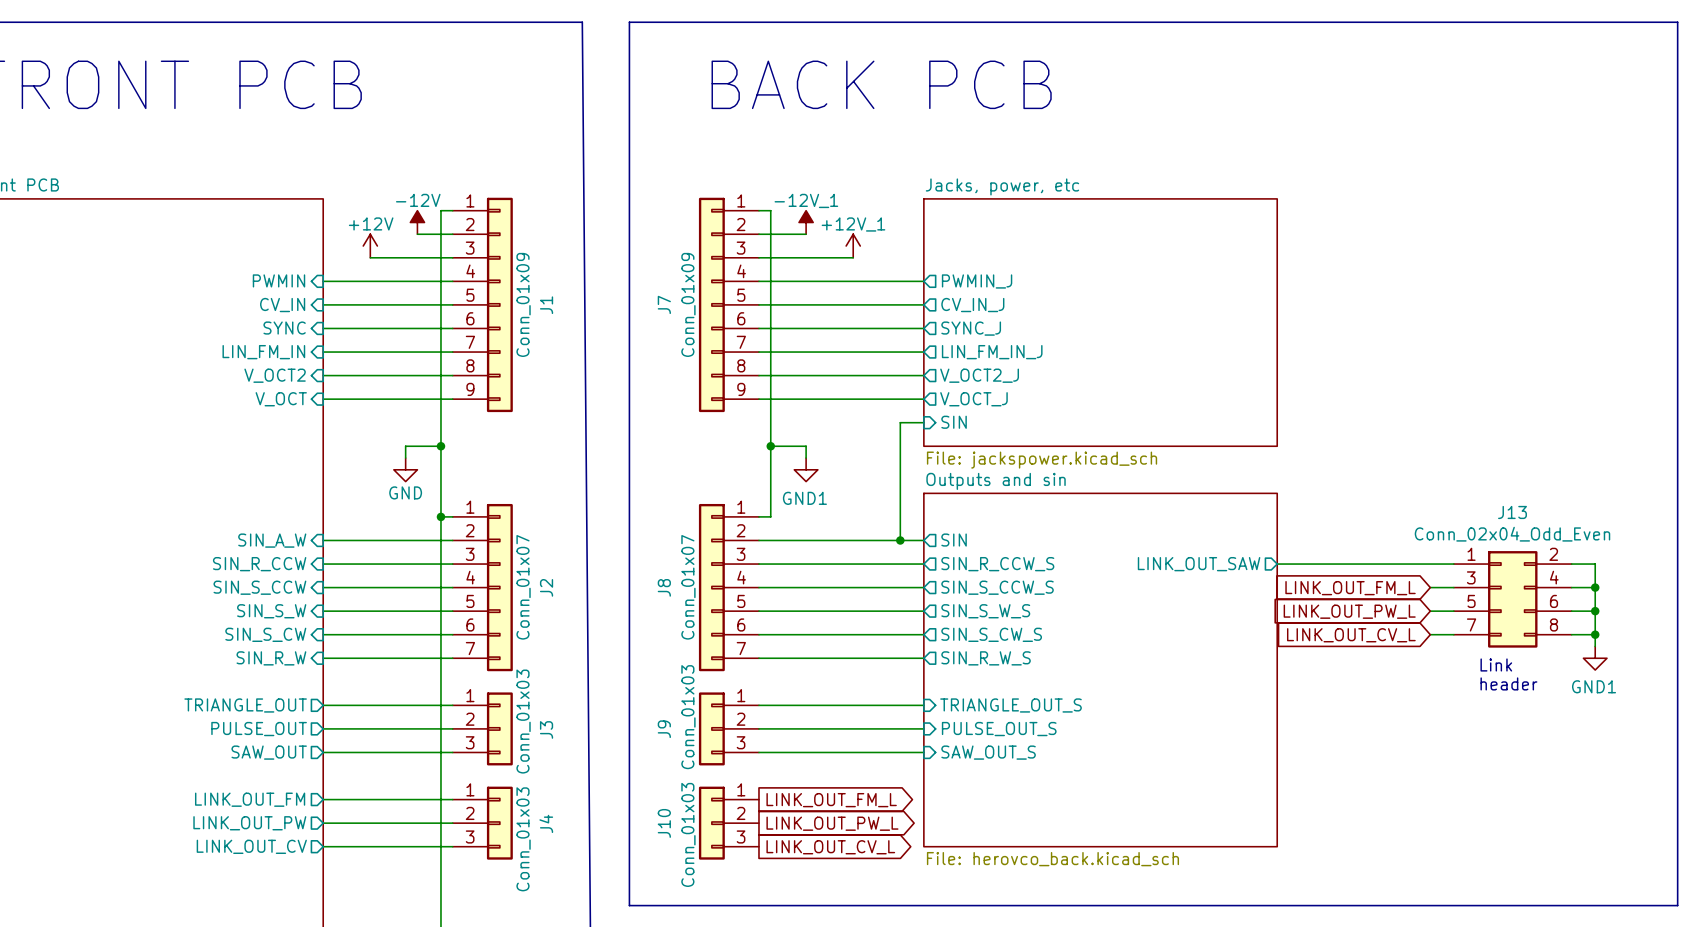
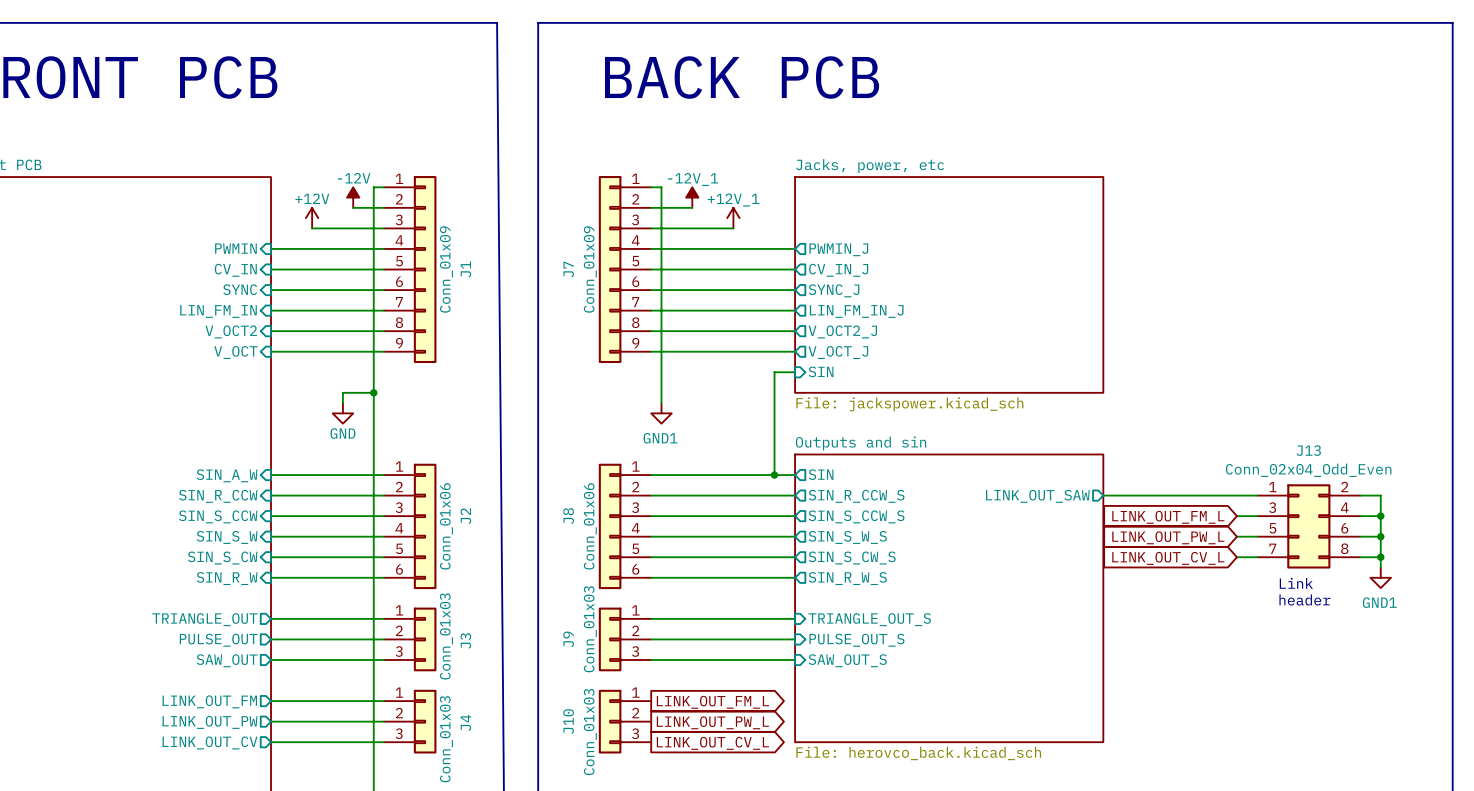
wire: (770, 446) (806, 446) (806, 458) -> none
junction: (770, 446) -> none
wire: (770, 458) (770, 516) (758, 516) -> none
power symbol position: GND1 (806, 469) -> GND1 (661, 413)
J2 symbol: [452, 503, 513, 672] -> [384, 463, 437, 590]
J8 symbol: [698, 503, 759, 672] -> [598, 463, 652, 590]
wire: (440, 516) (452, 516) -> none
junction: (440, 516) -> none
J2 value: Conn_01x07 (523, 587) -> Conn_01x06 (446, 526)
J8 value: Conn_01x07 (688, 587) -> Conn_01x06 (590, 526)
sheet Outputs and sin: File: herovco_back.kicad_sch (1100, 670) -> none
sheet Outputs and sin: none -> File: herovco_back.kicad_sch (949, 598)

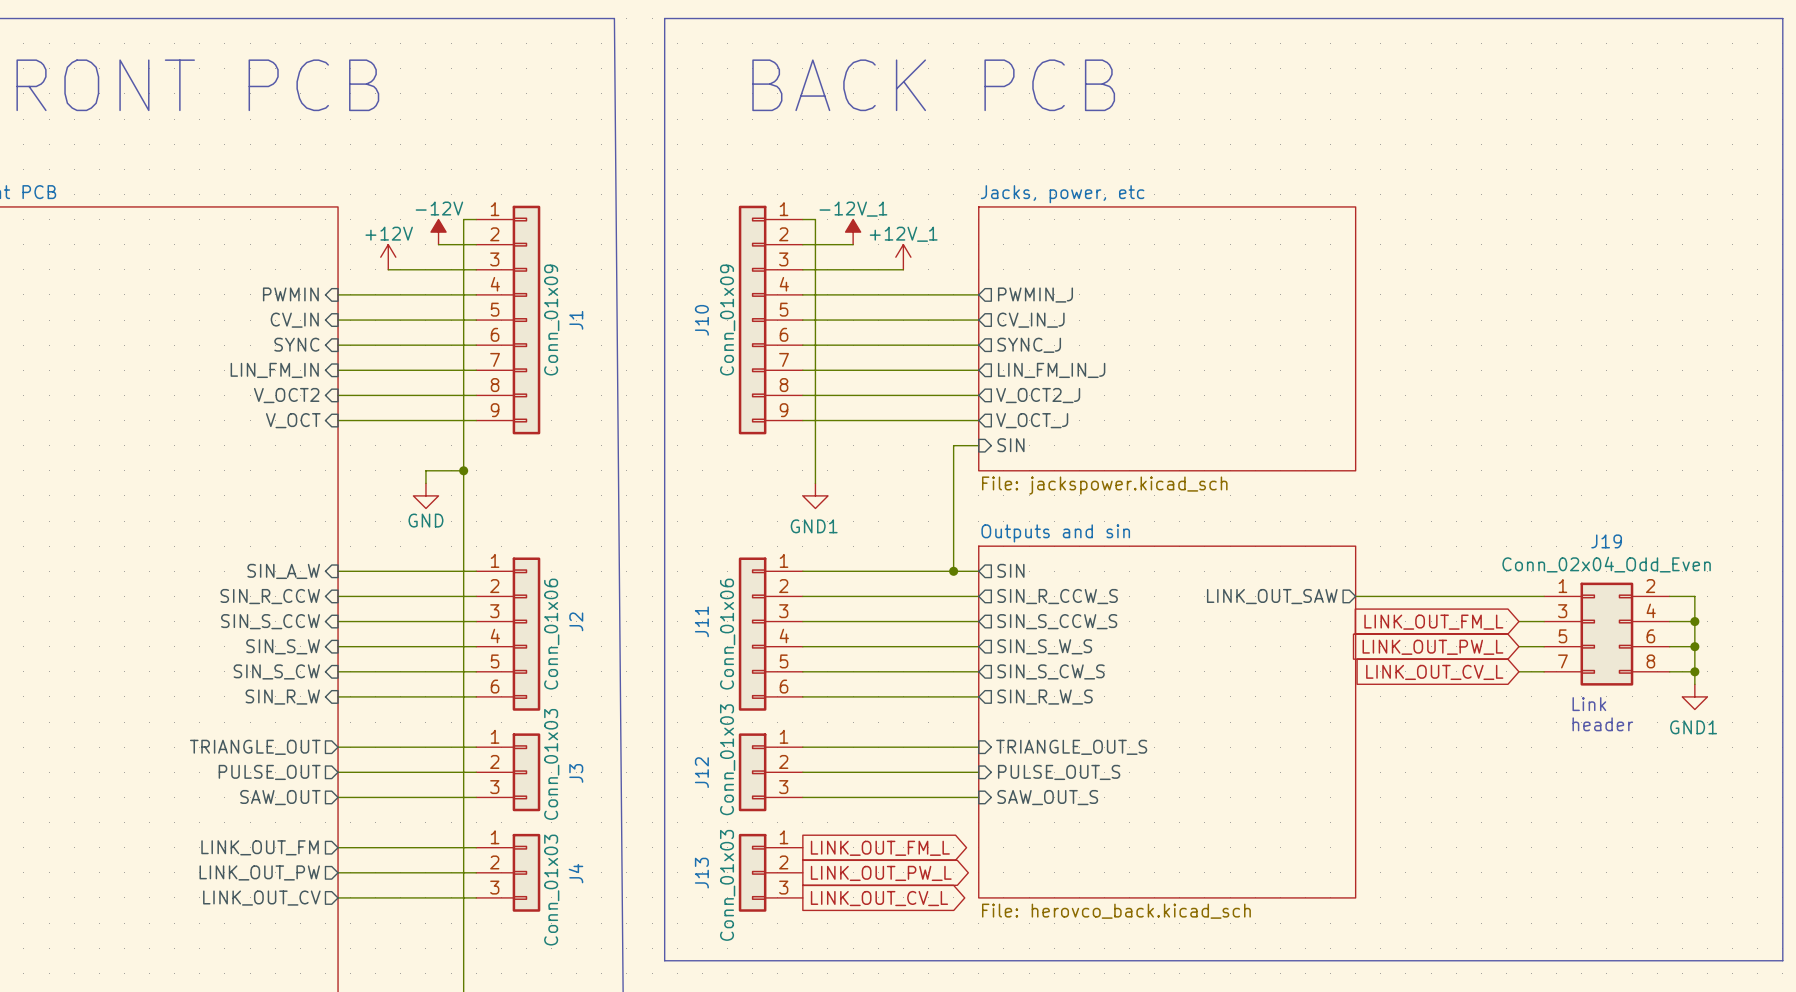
J7 name: J7 (568, 269) -> J10 (701, 320)
J13 name: J13 (1308, 450) -> J19 (1606, 541)
J8 name: J8 (568, 515) -> J11 (701, 621)
J9 name: J9 (568, 639) -> J12 (701, 772)
J10 name: J10 (568, 721) -> J13 (701, 873)

